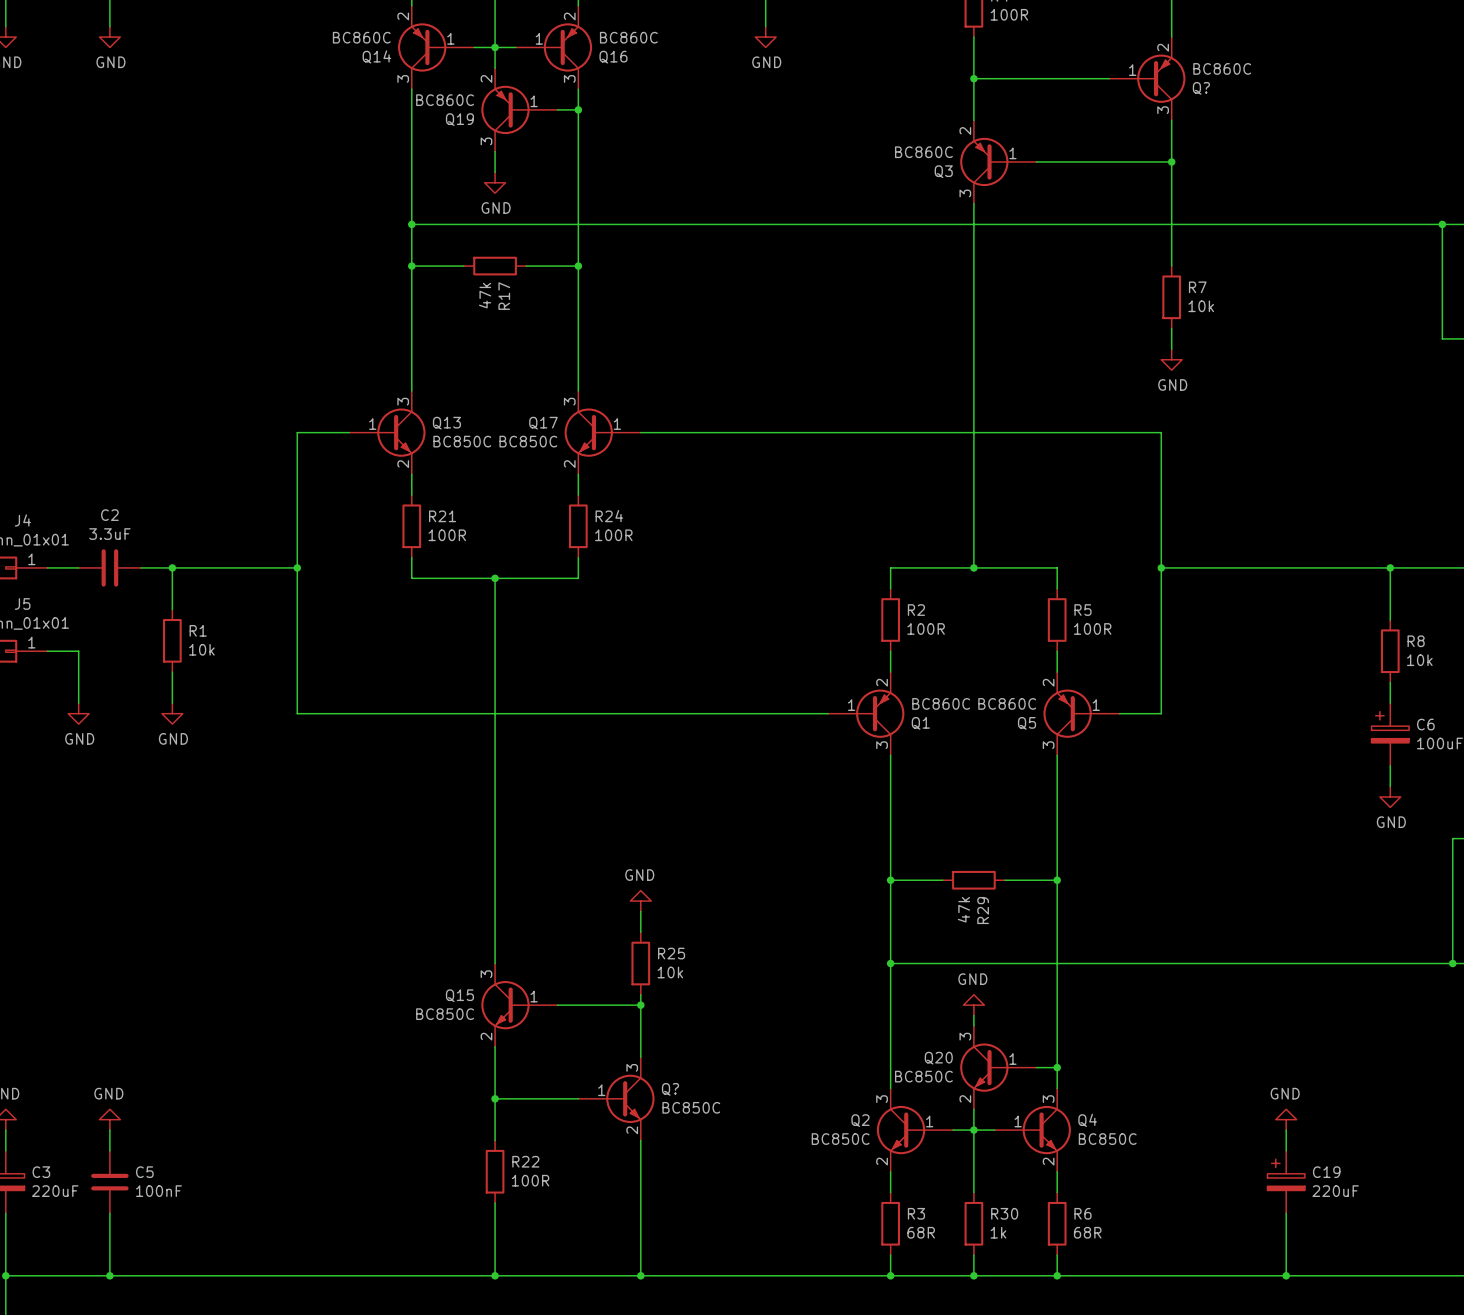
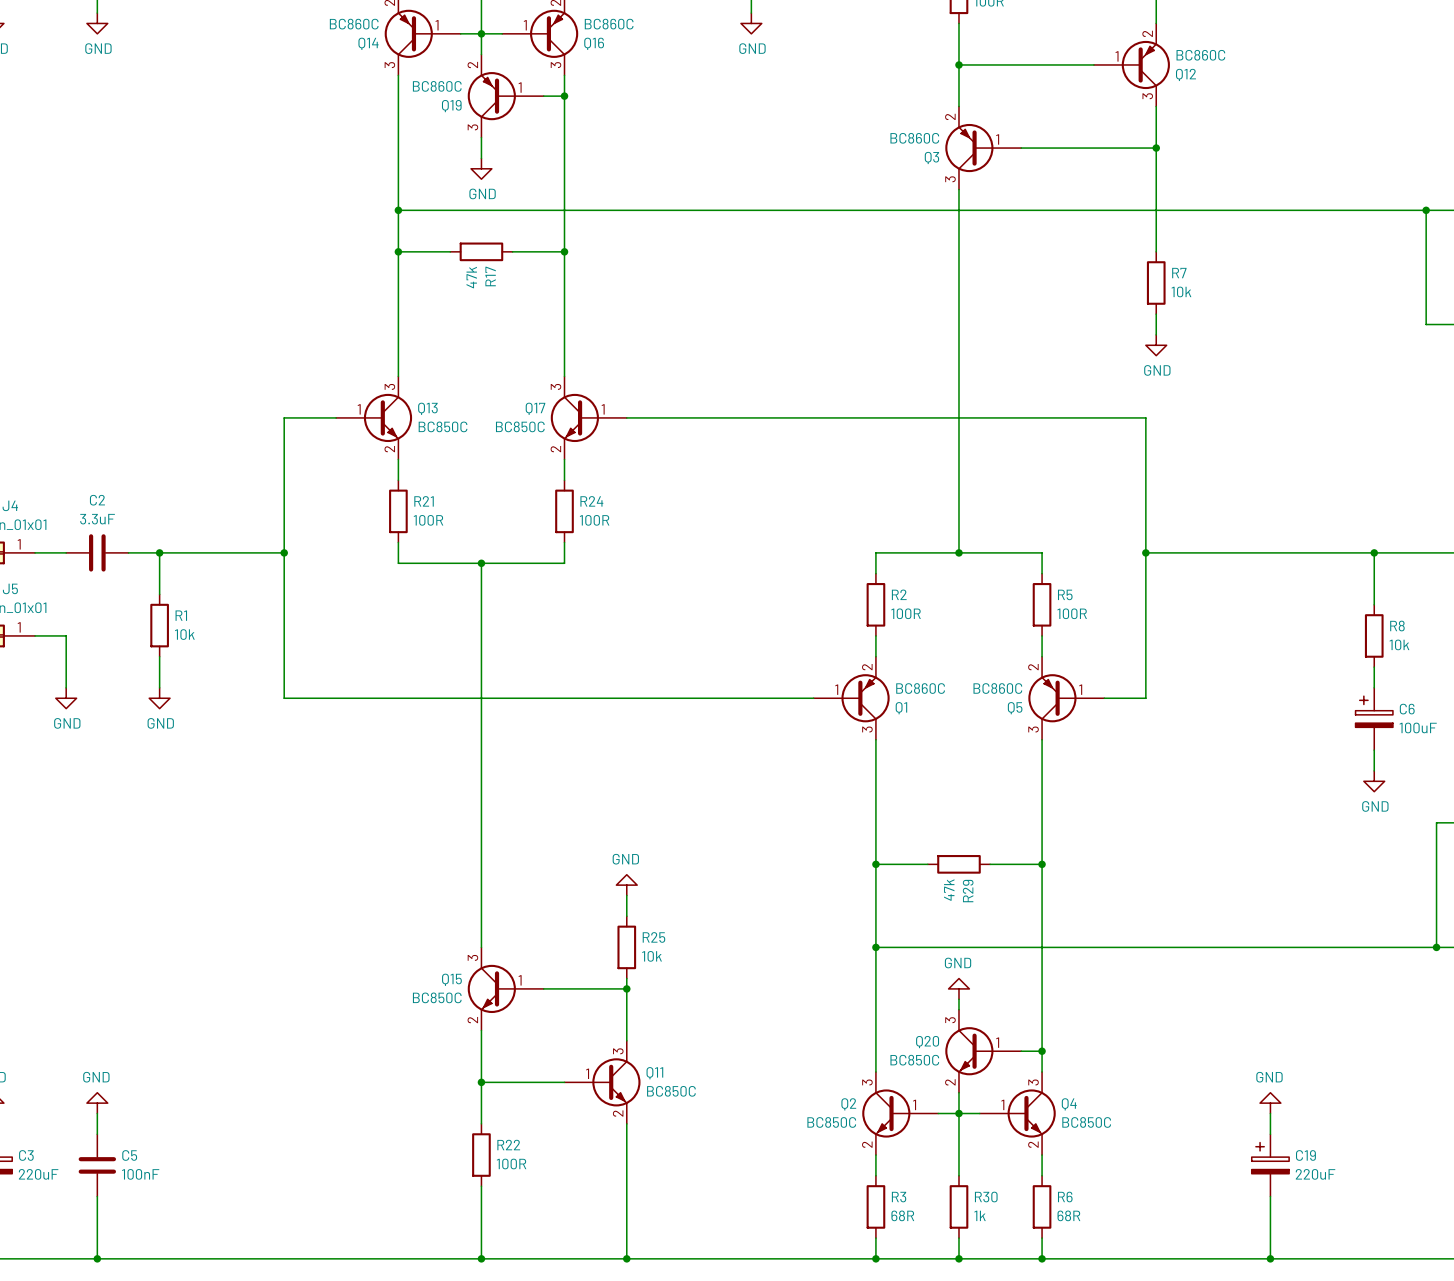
Q? name: Q? (1201, 88) -> Q12 (1185, 74)
Q? name: Q? (670, 1089) -> Q11 (654, 1073)

